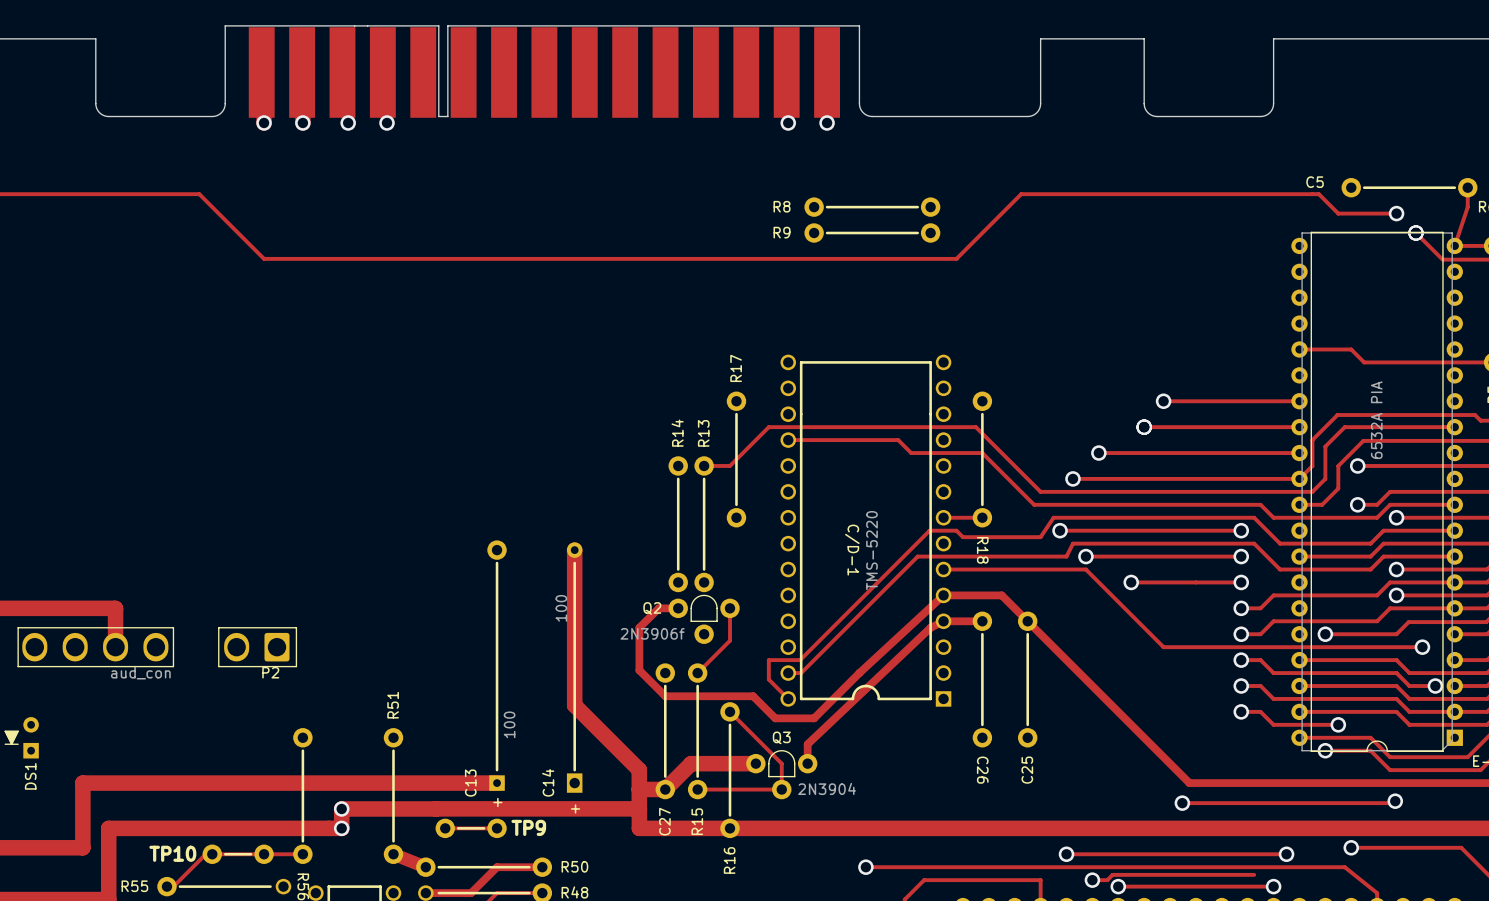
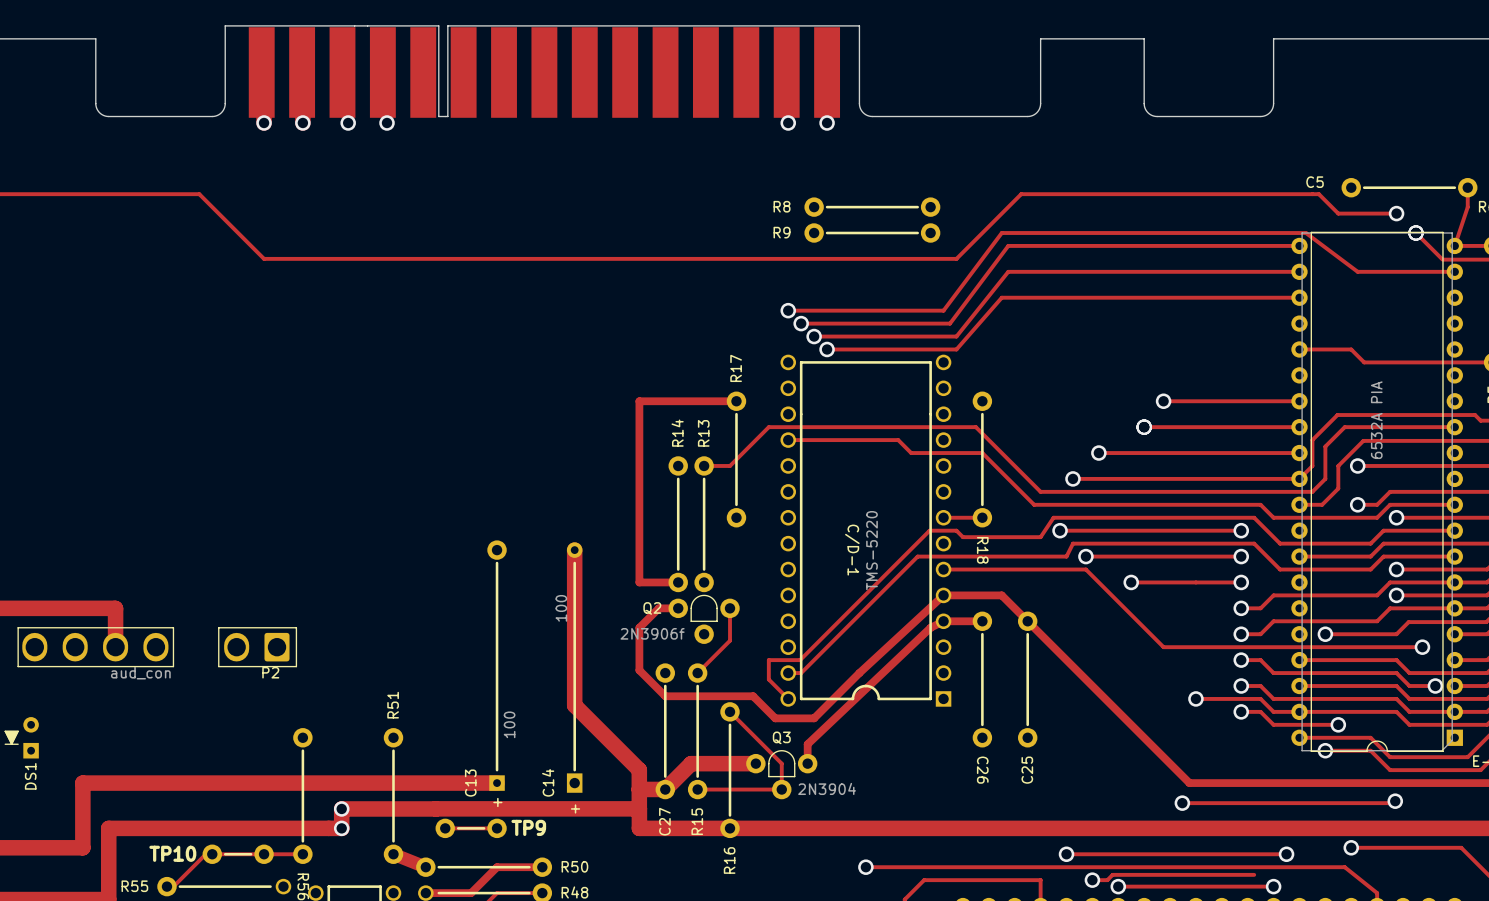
track: none -> (1299, 245) (1008, 245) (950, 323) (801, 323)
track: none -> (1299, 271) (1008, 271) (956, 336) (814, 336)
track: none -> (1454, 271) (1357, 271) (1305, 233) (1001, 233) (943, 310) (788, 310)
track: none -> (1299, 297) (1001, 297) (956, 349) (827, 349)
via: none -> (788, 310)
via: none -> (801, 323)
via: none -> (814, 336)
via: none -> (827, 349)
track: none -> (736, 401) (639, 401) (639, 582) (678, 582)
track: none -> (1195, 698) (1260, 698) (1273, 711) (1299, 711)
via: none -> (1195, 698)

